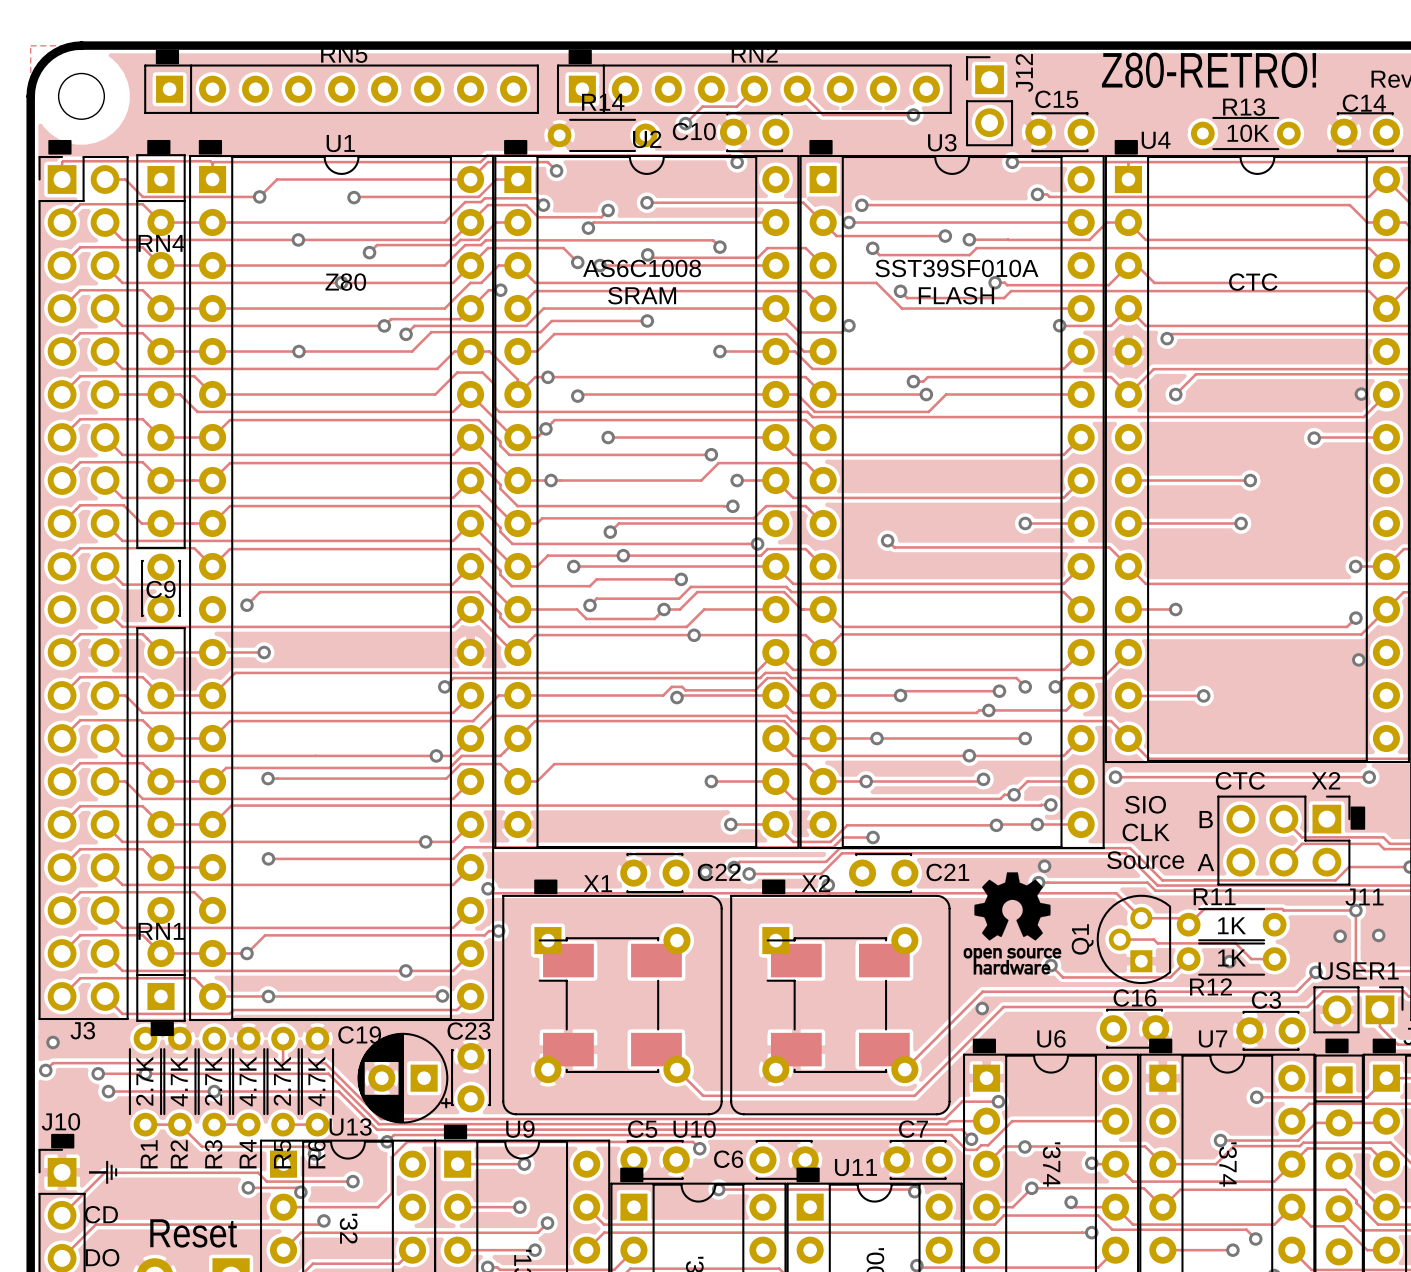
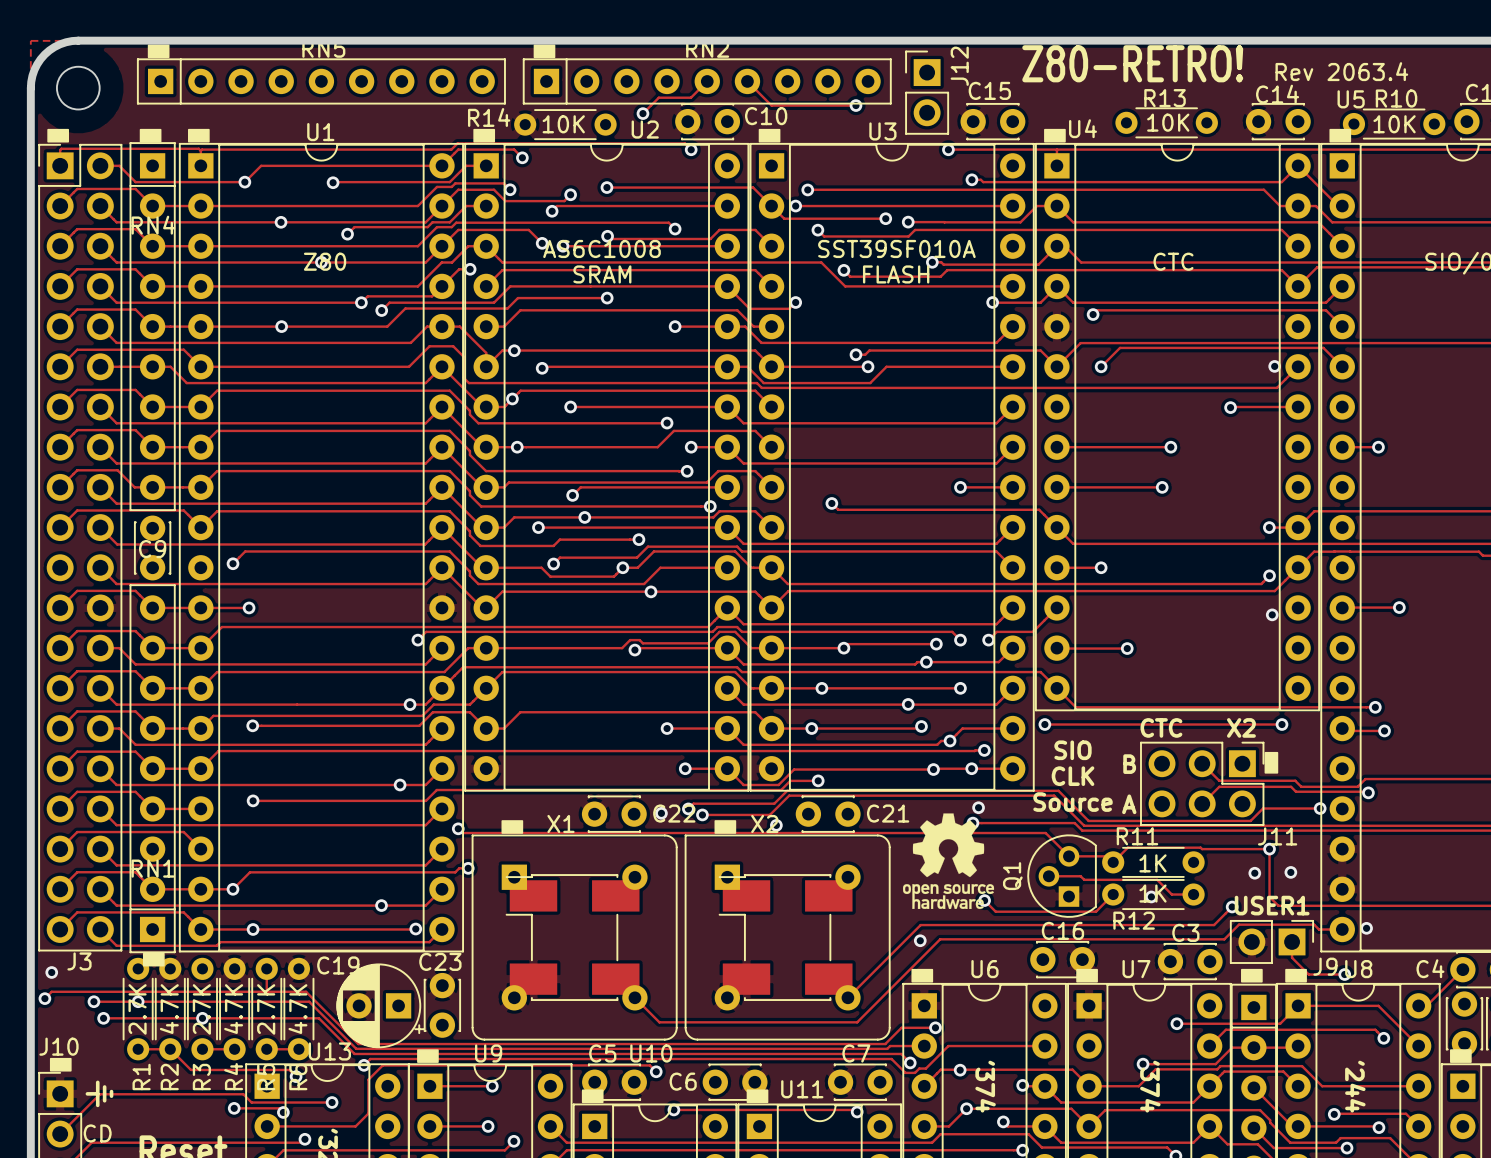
R14 name position: R14 (603, 102) -> R14 (489, 117)
C10 name position: C10 (694, 131) -> C10 (766, 116)
text: none -> 10K (563, 124)
U2 name position: U2 (647, 139) -> U2 (645, 129)

